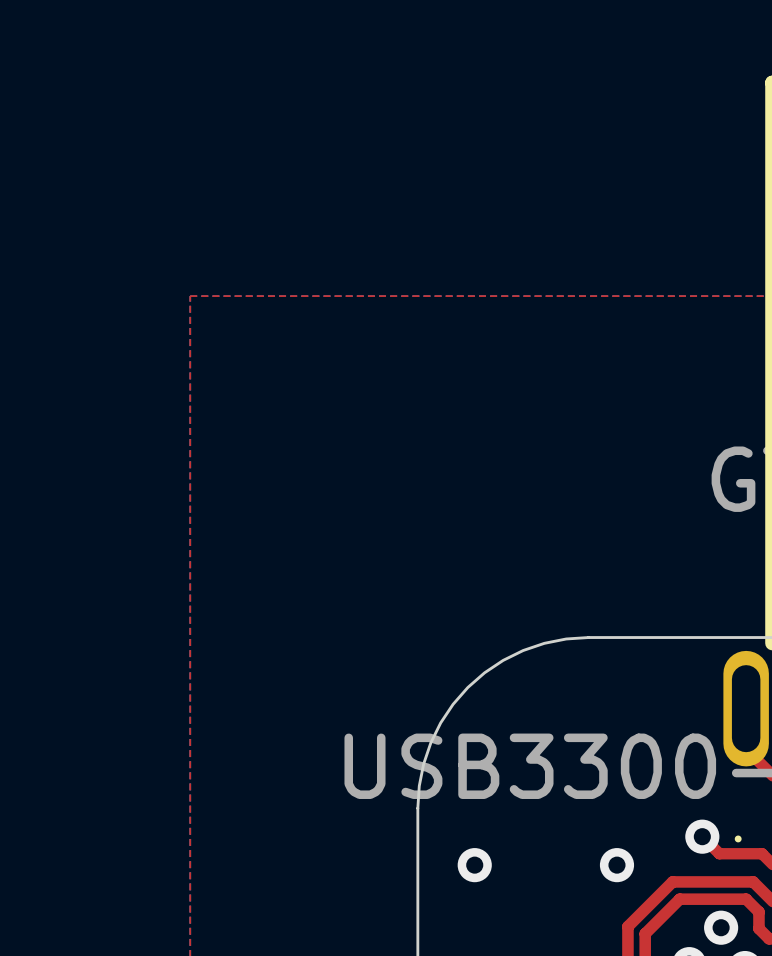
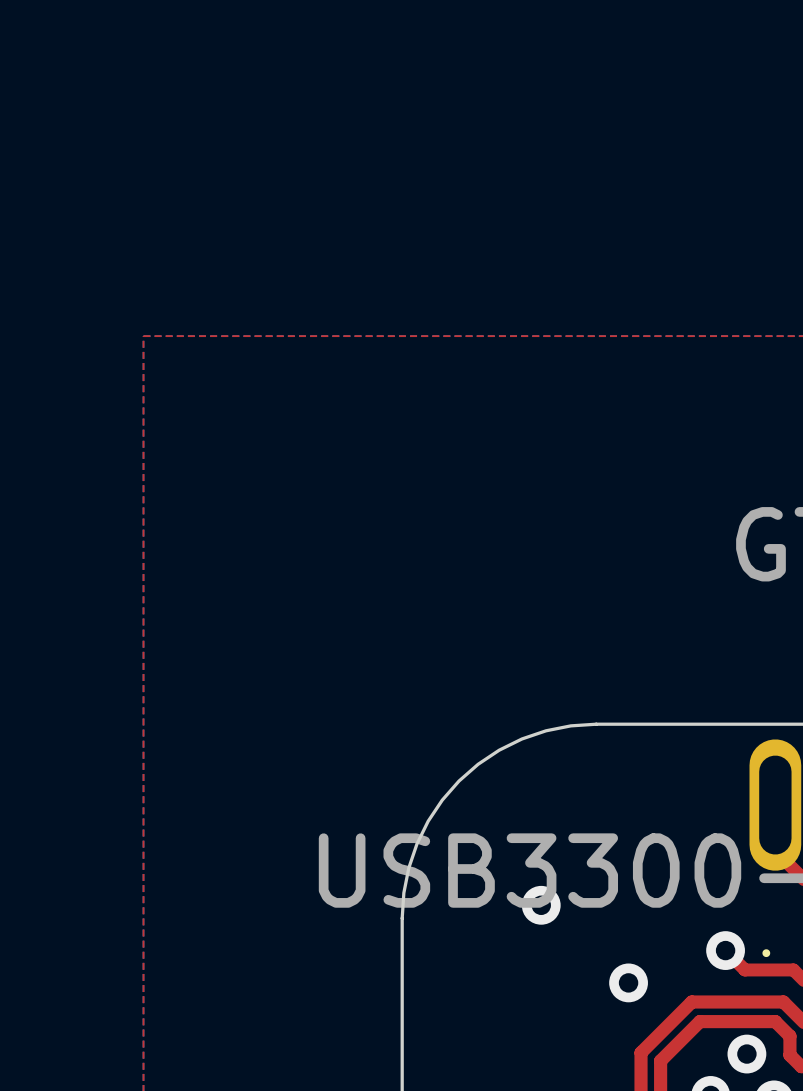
via position: (474, 865) -> (541, 905)

